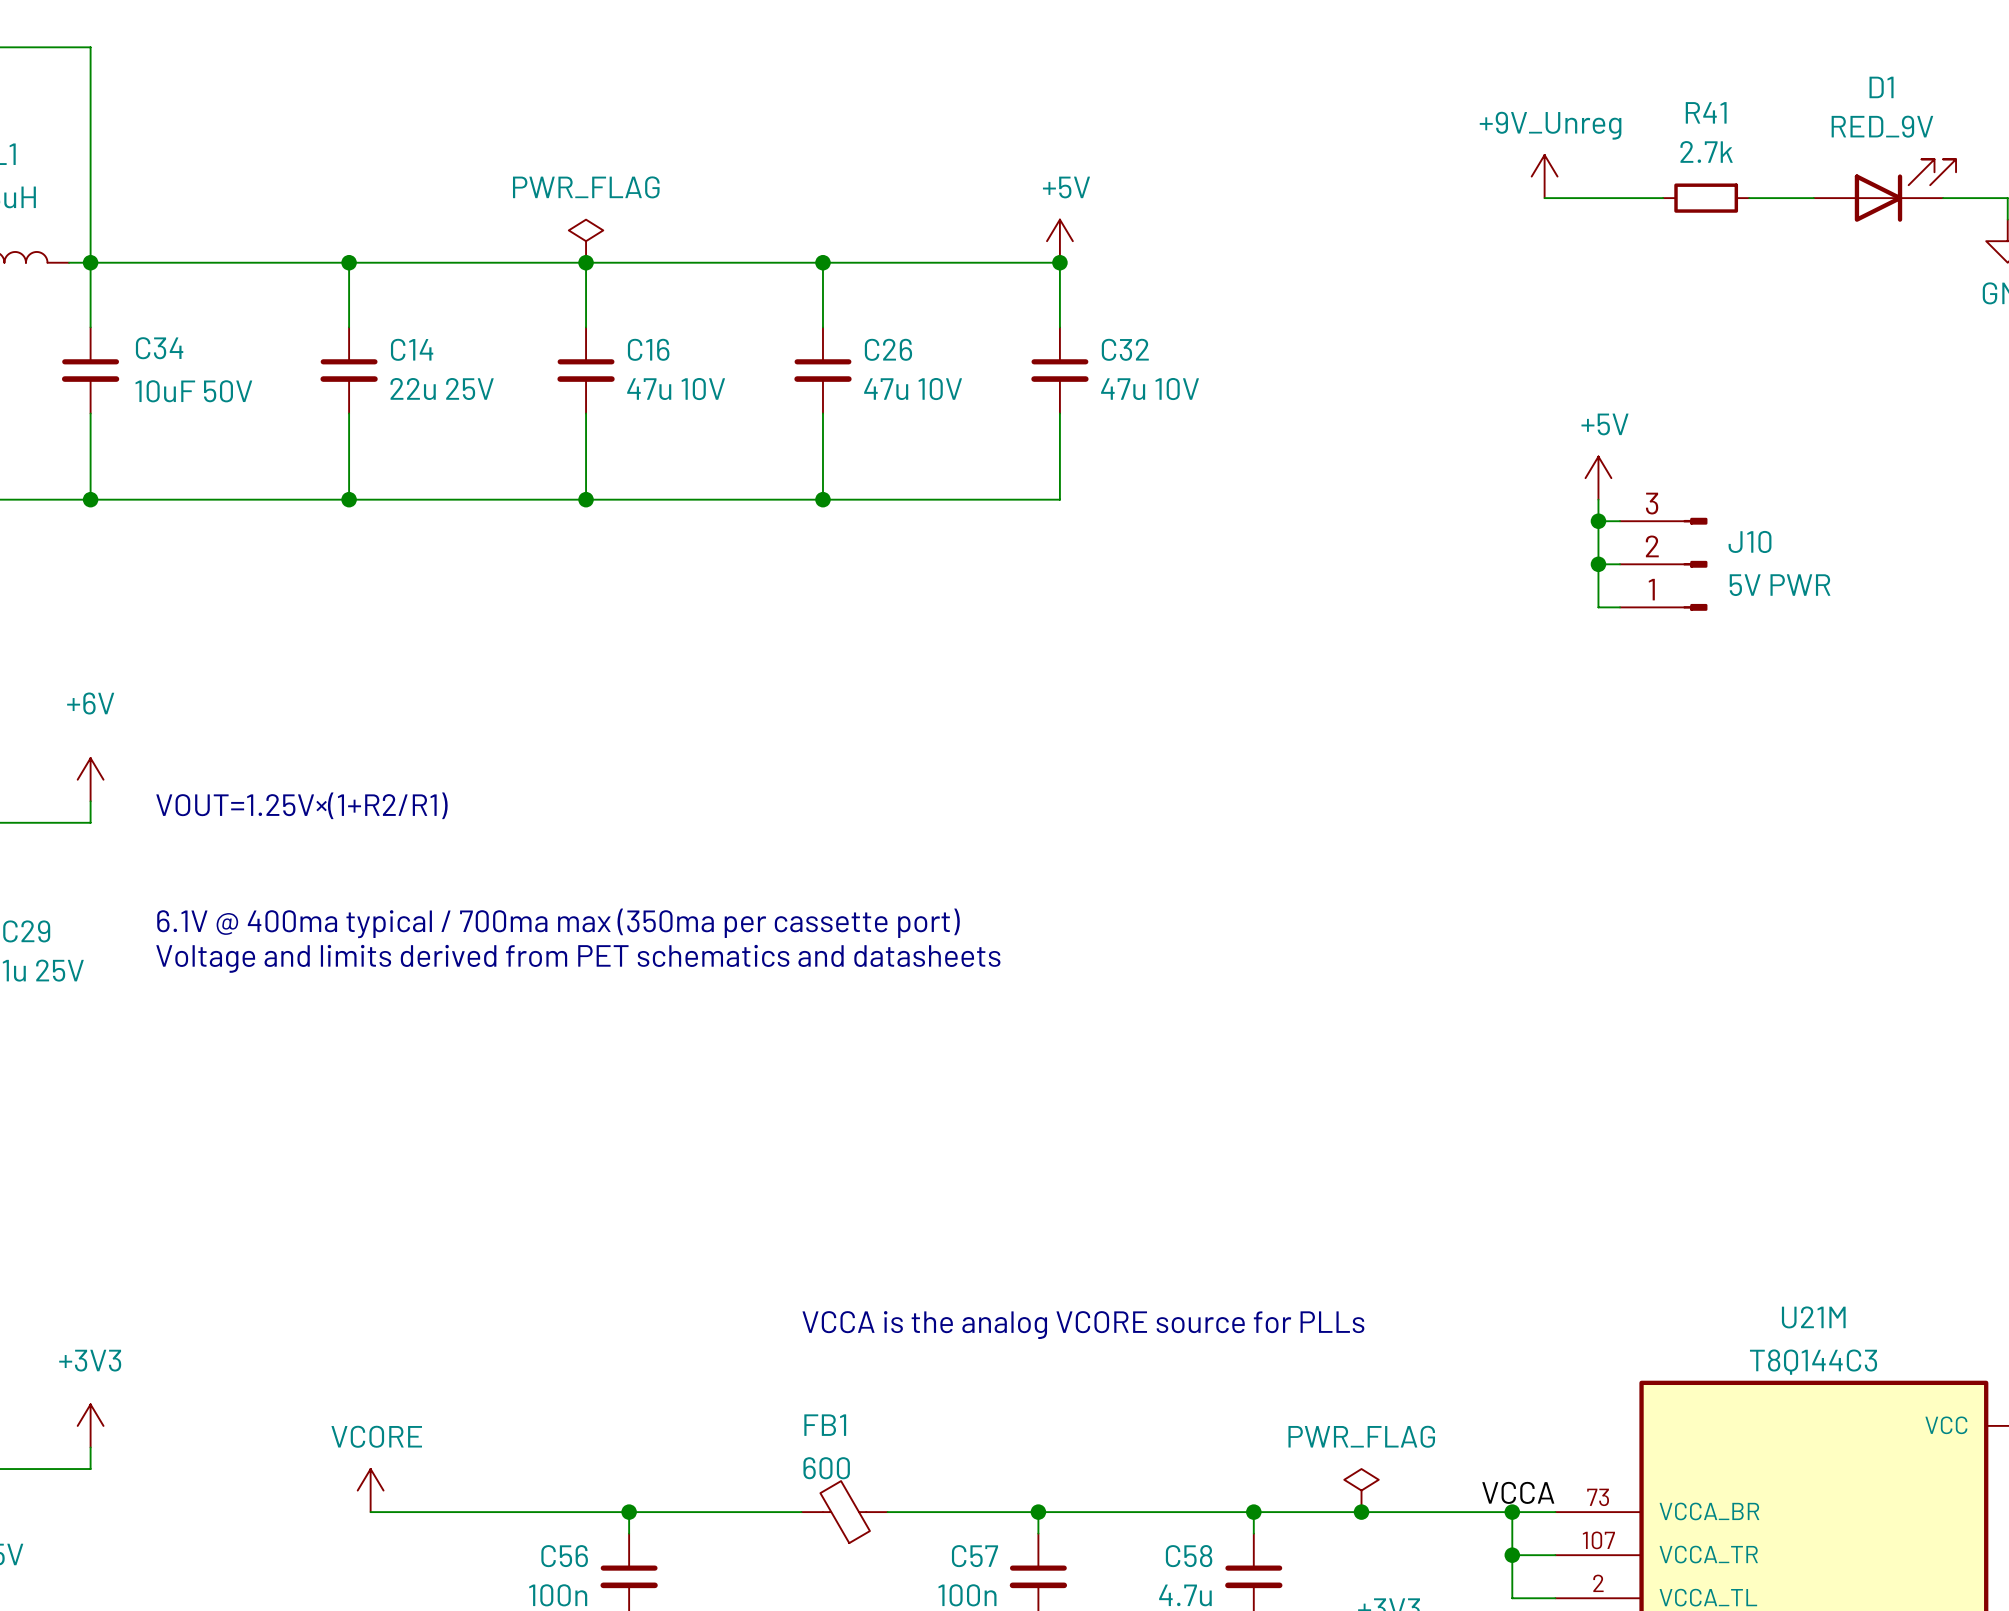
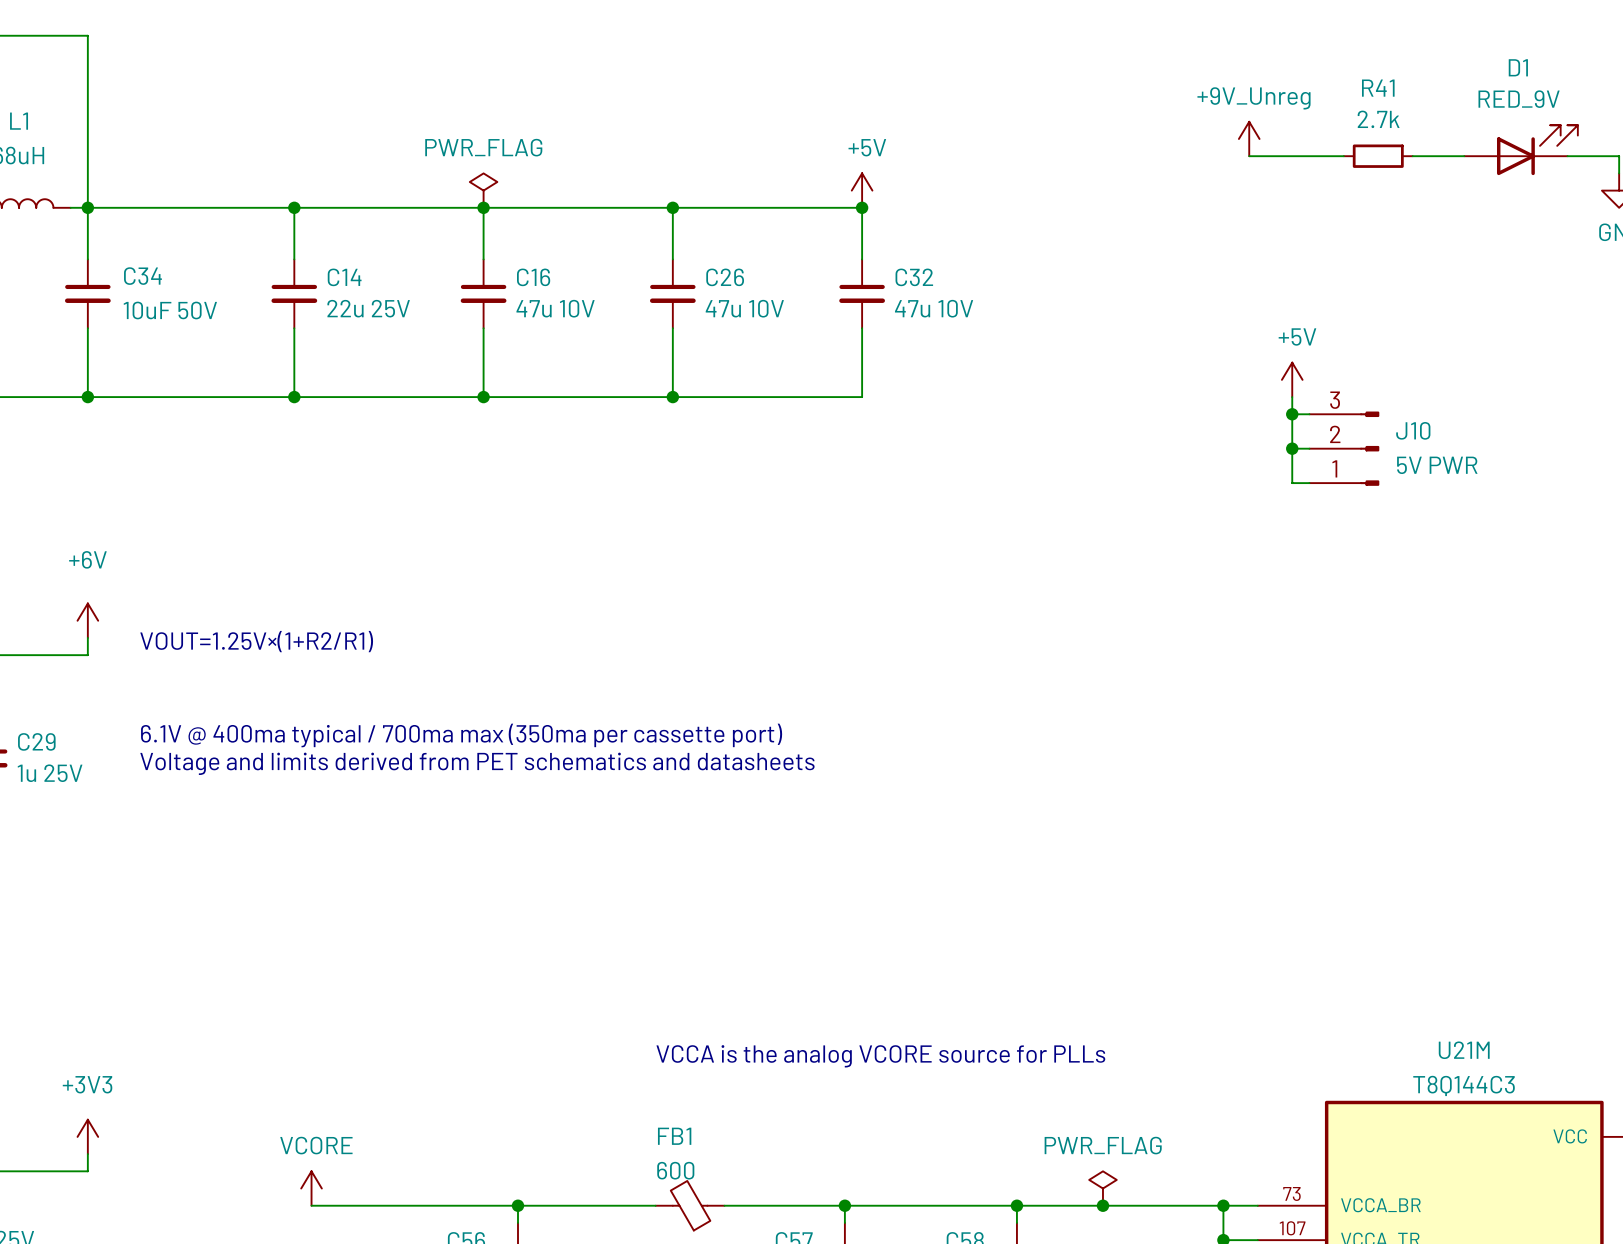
label: VCCA (1518, 1492) -> none

